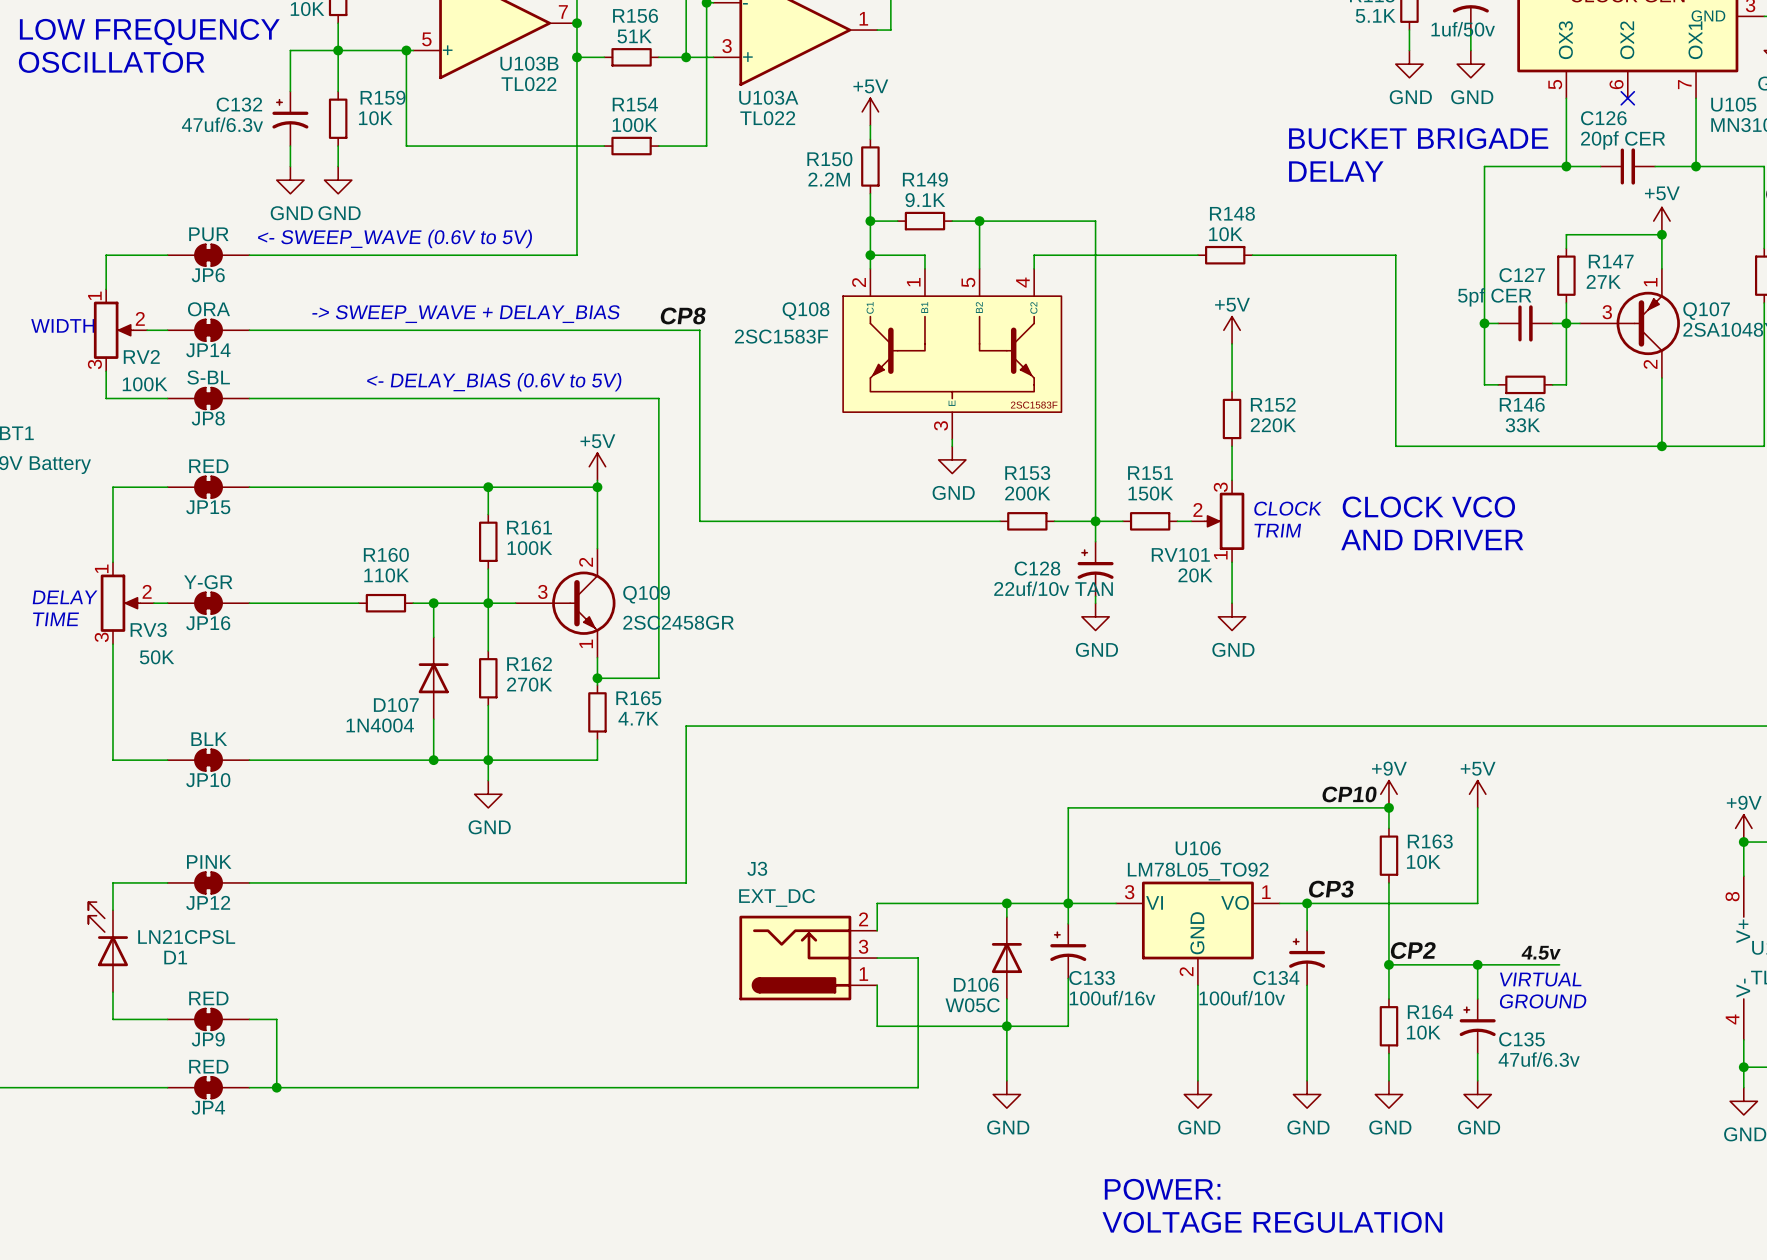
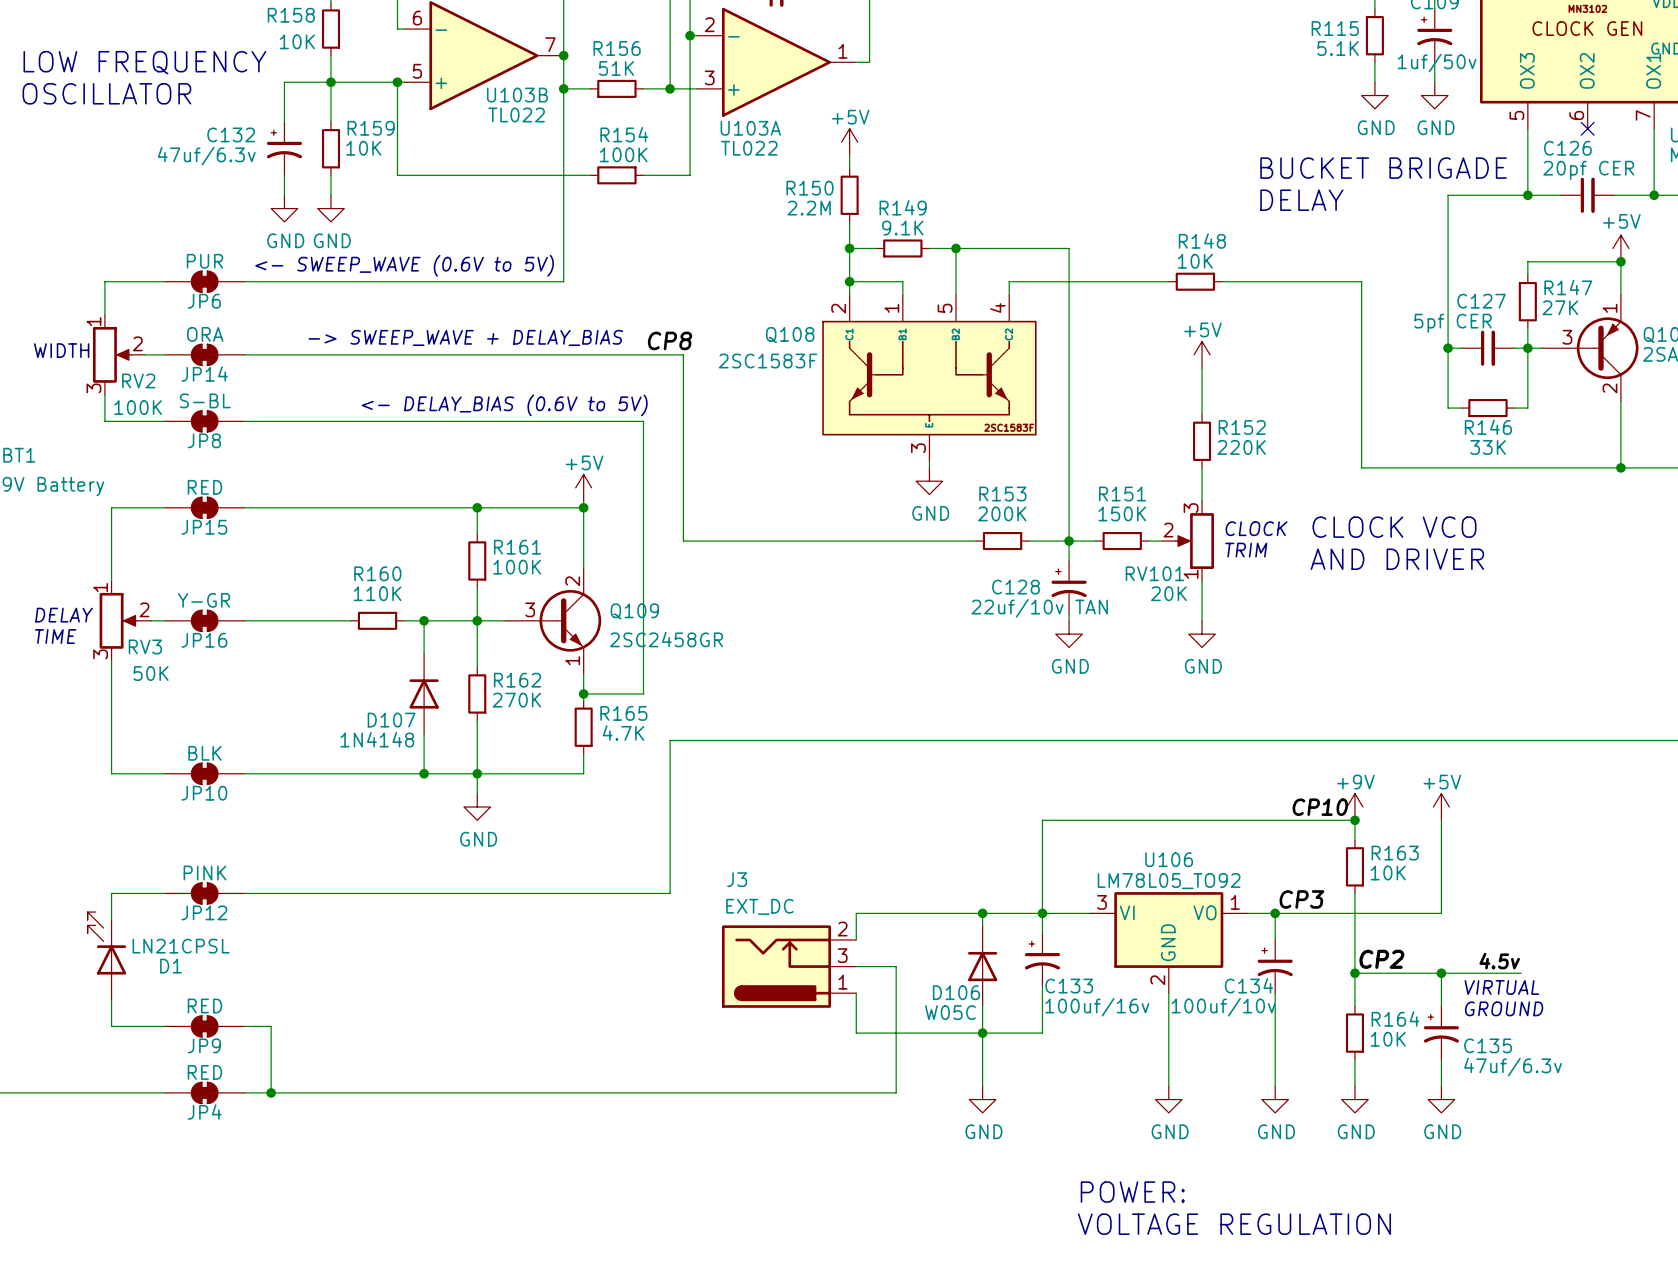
D107 value: 1N4004 (380, 725) -> 1N4148 (377, 739)

